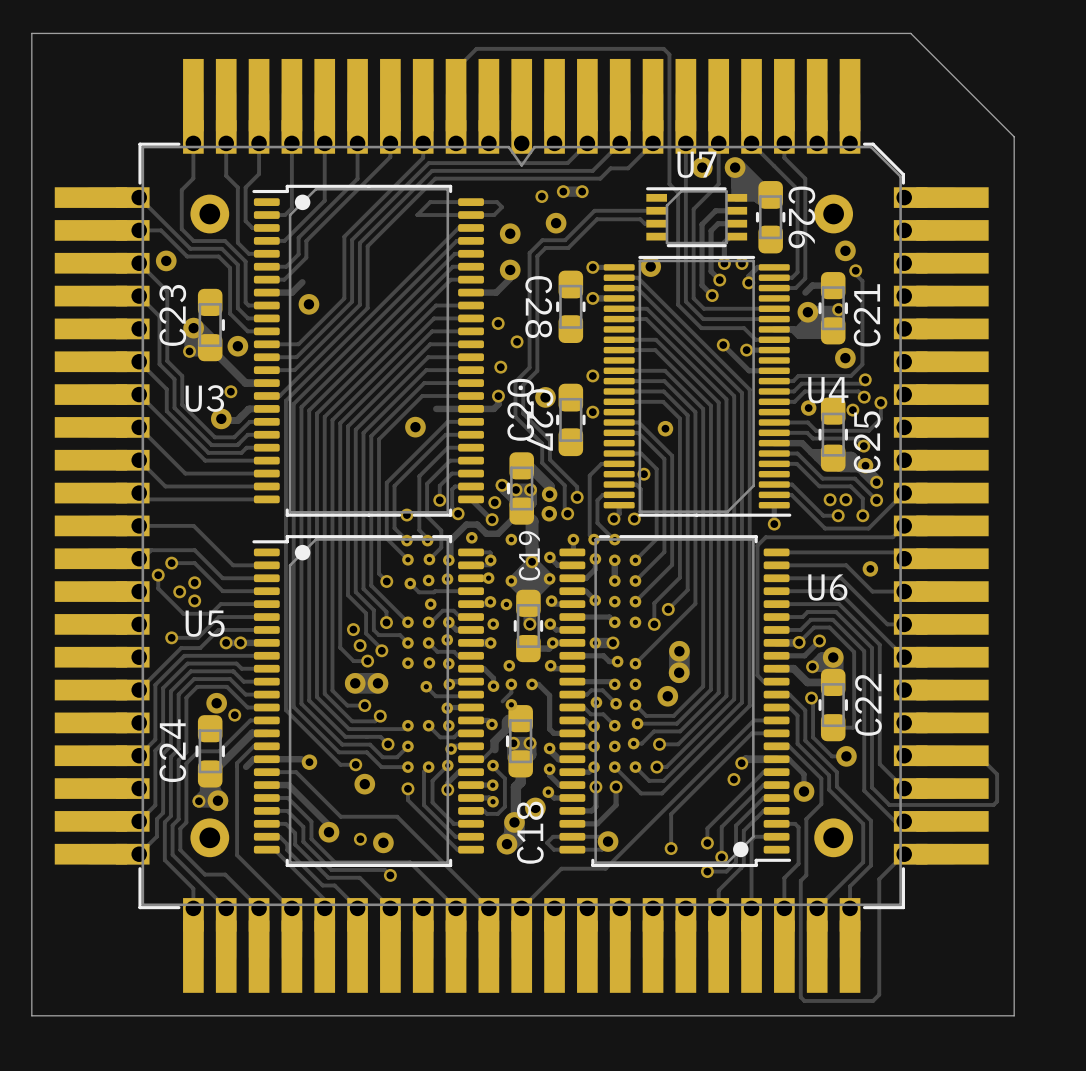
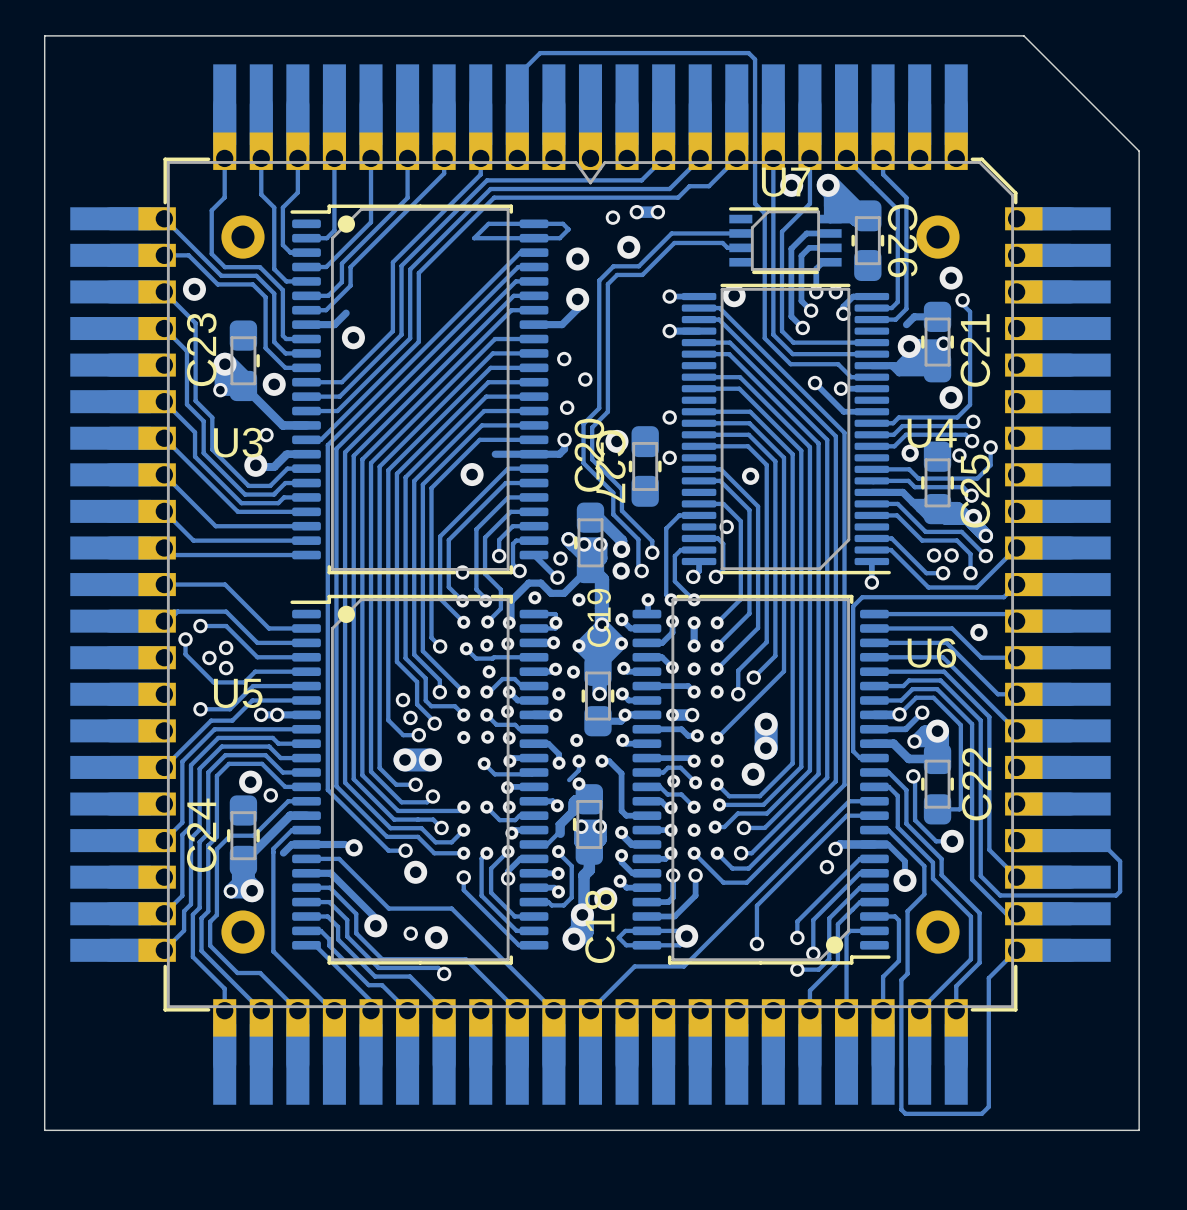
C28: (570, 306) -> none

